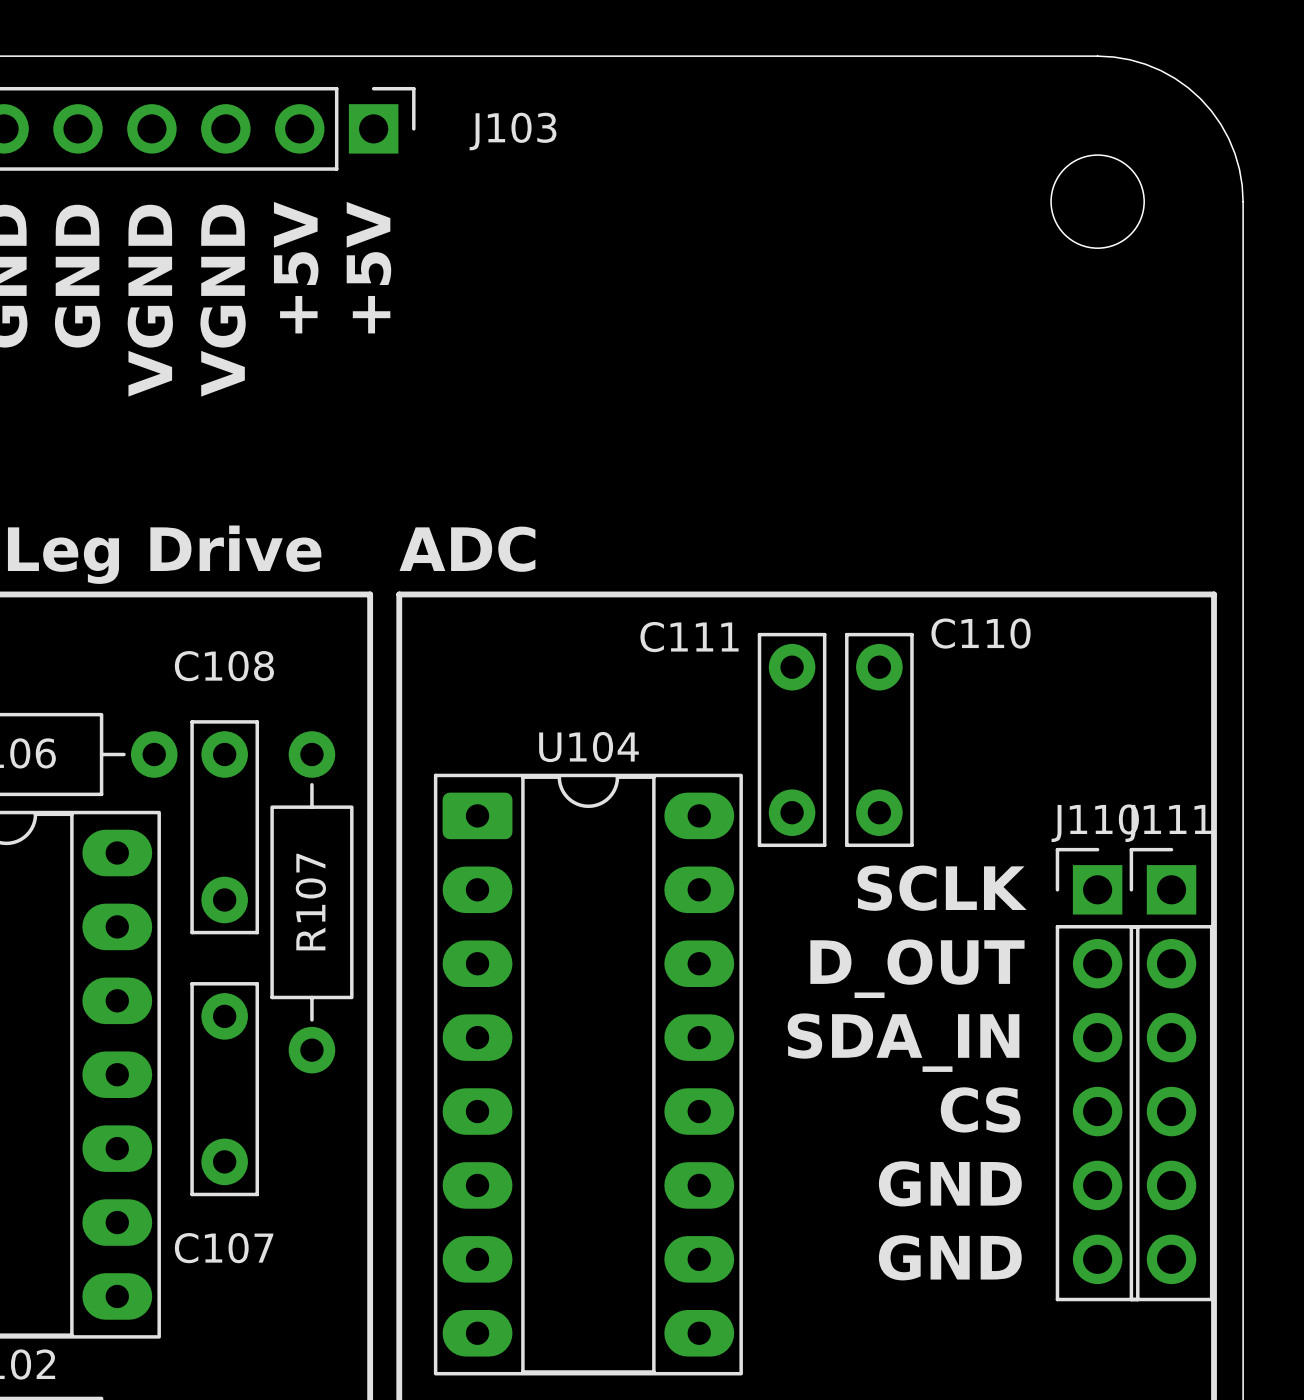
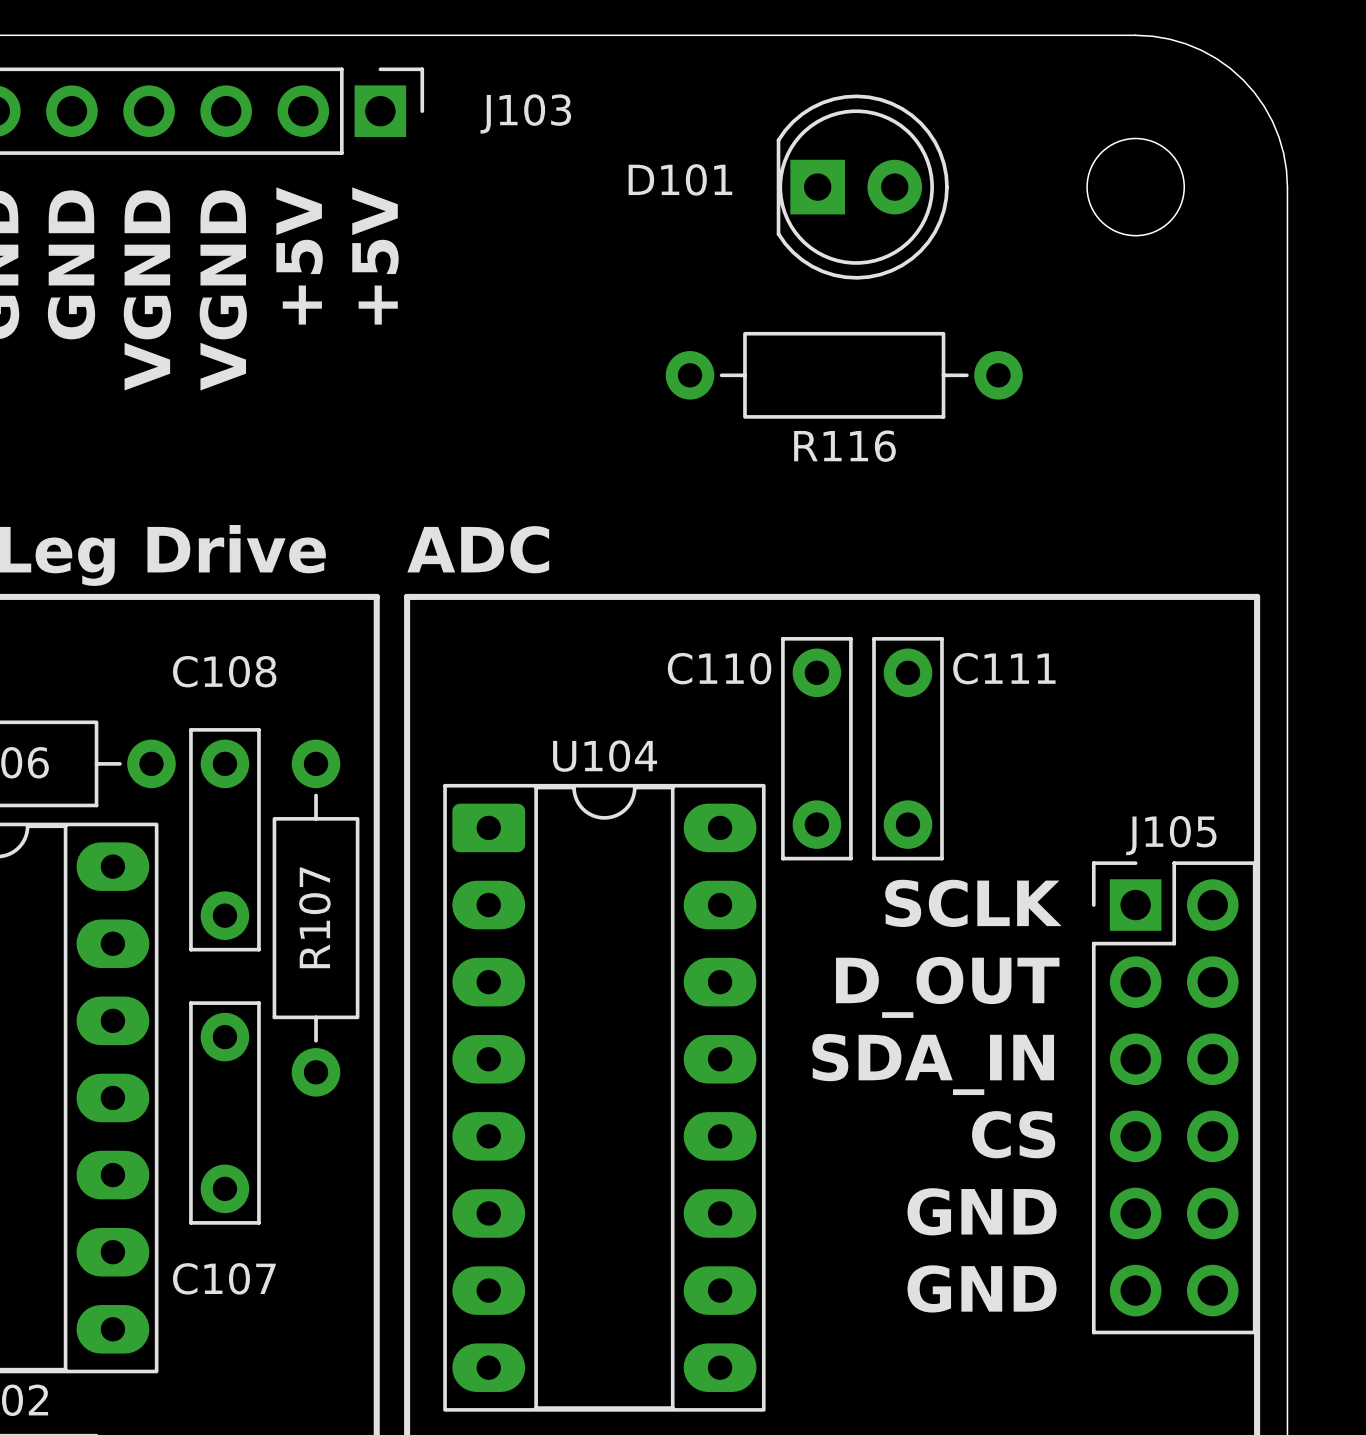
D101: none -> (862, 187)
R116: none -> (844, 375)
C110 name: C110 (981, 633) -> C111 (1004, 668)
C111 name: C111 (689, 637) -> C110 (719, 668)
J110: (1097, 1074) -> none
J105: none -> (1174, 1097)
J111: (1171, 1074) -> none

